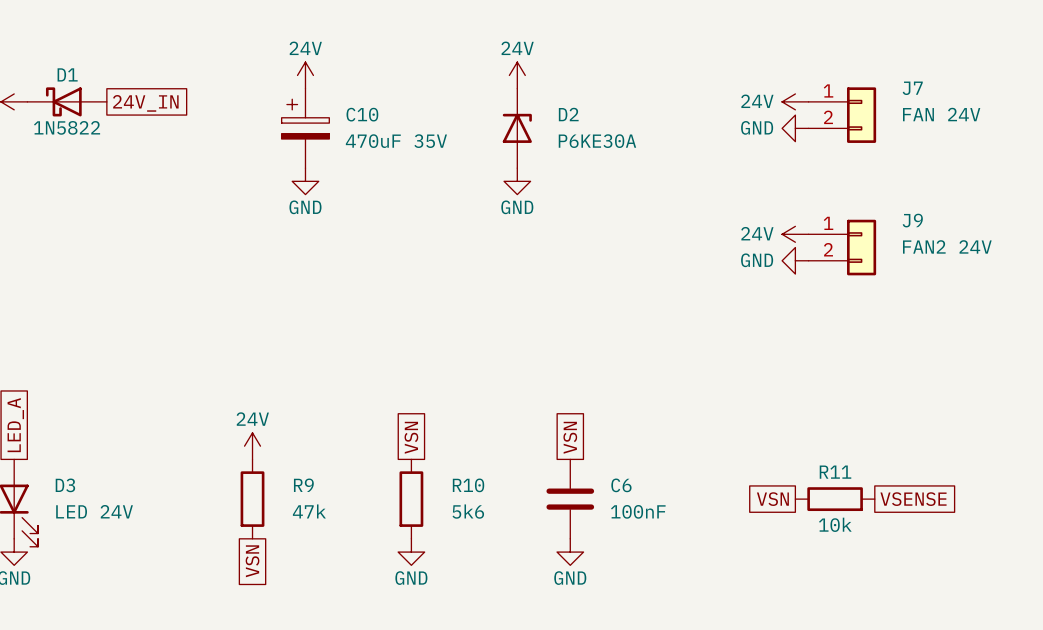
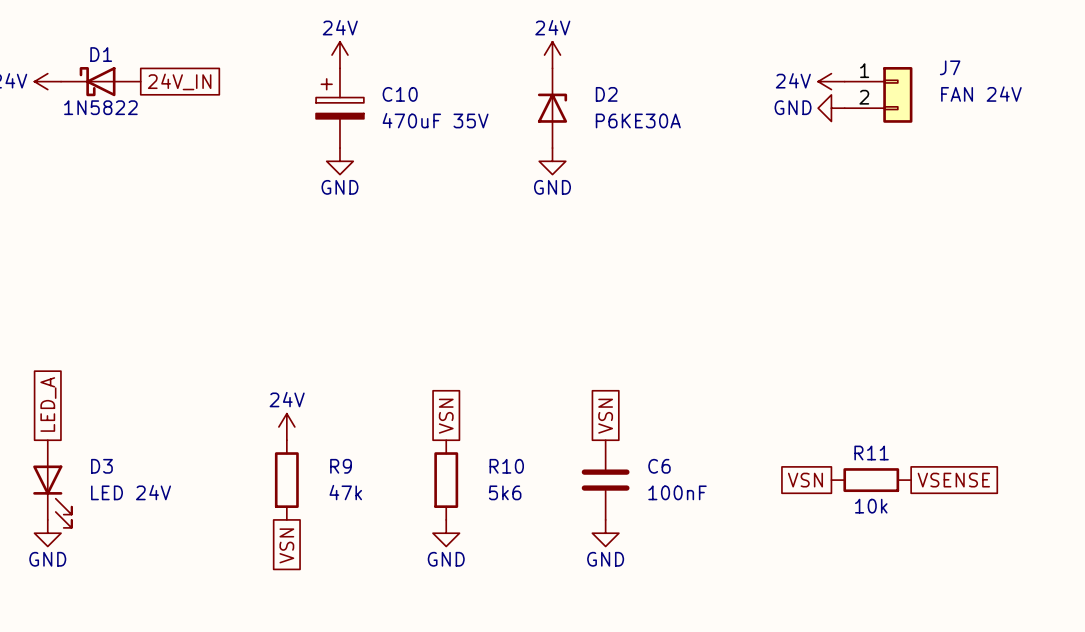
power symbol: 24V (795, 234) -> none
J9: FAN2 24V (842, 247) -> none
power symbol: GND (795, 260) -> none

